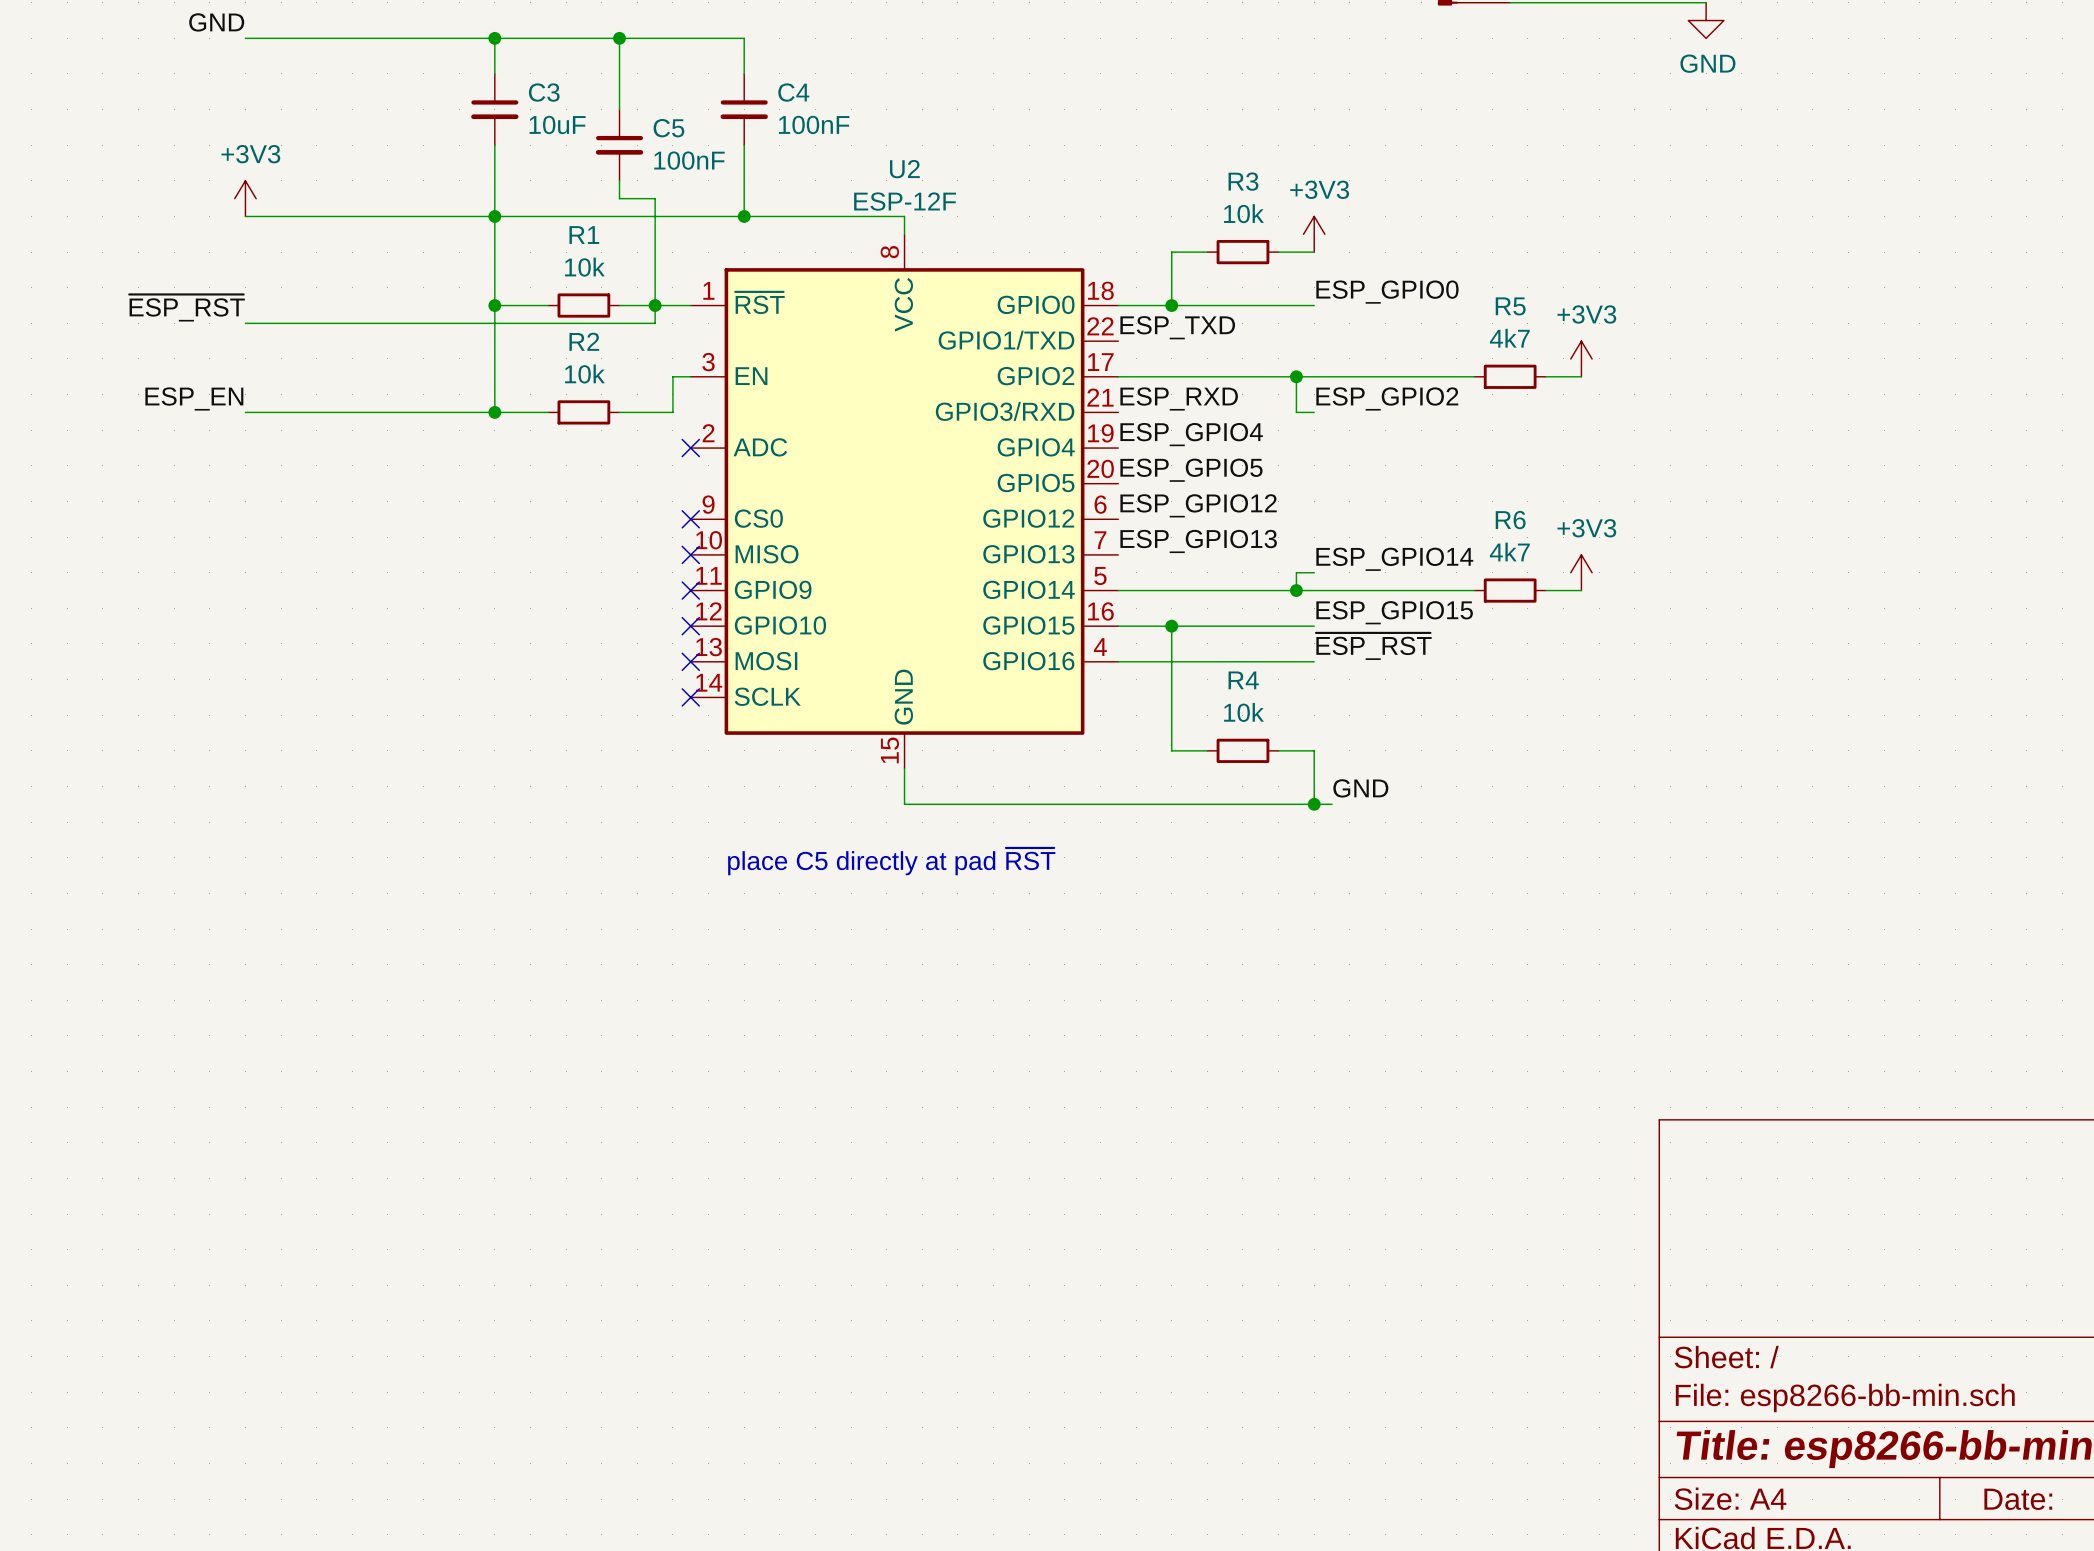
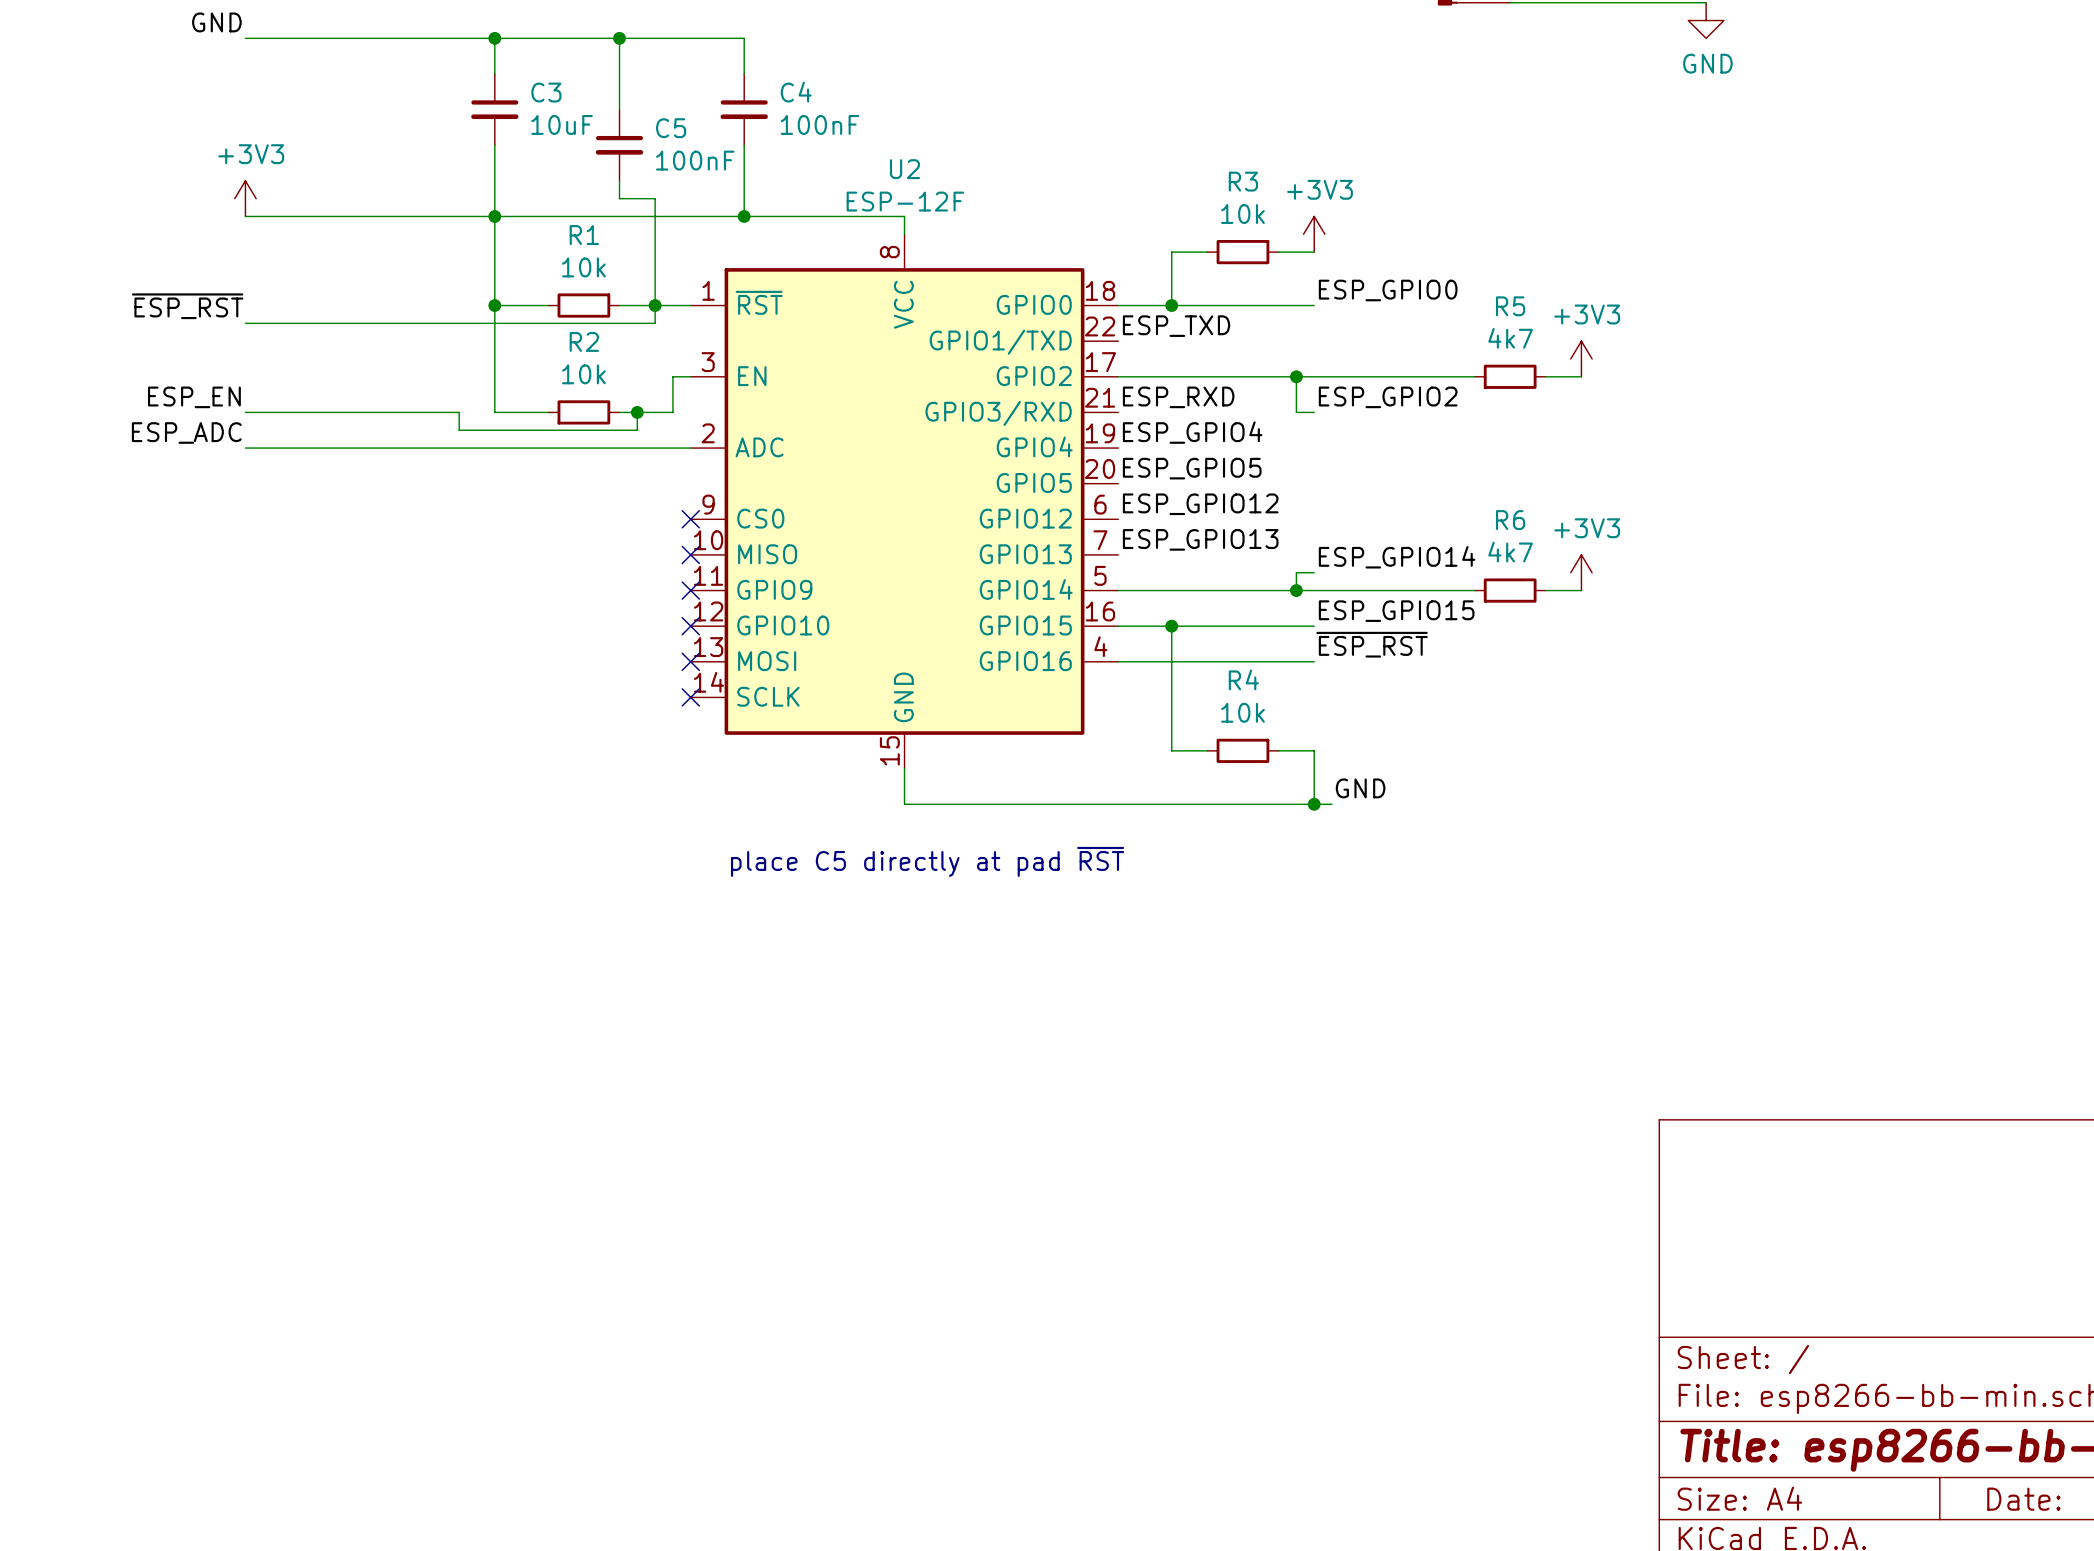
wire: (459, 412) (494, 412) -> (459, 412) (459, 430) (637, 430) (637, 412)
junction: (494, 412) -> none
junction: none -> (637, 412)
label: none -> ESP_ADC (186, 433)
wire: none -> (245, 448) (690, 448)
no-connect mark: (690, 448) -> none

